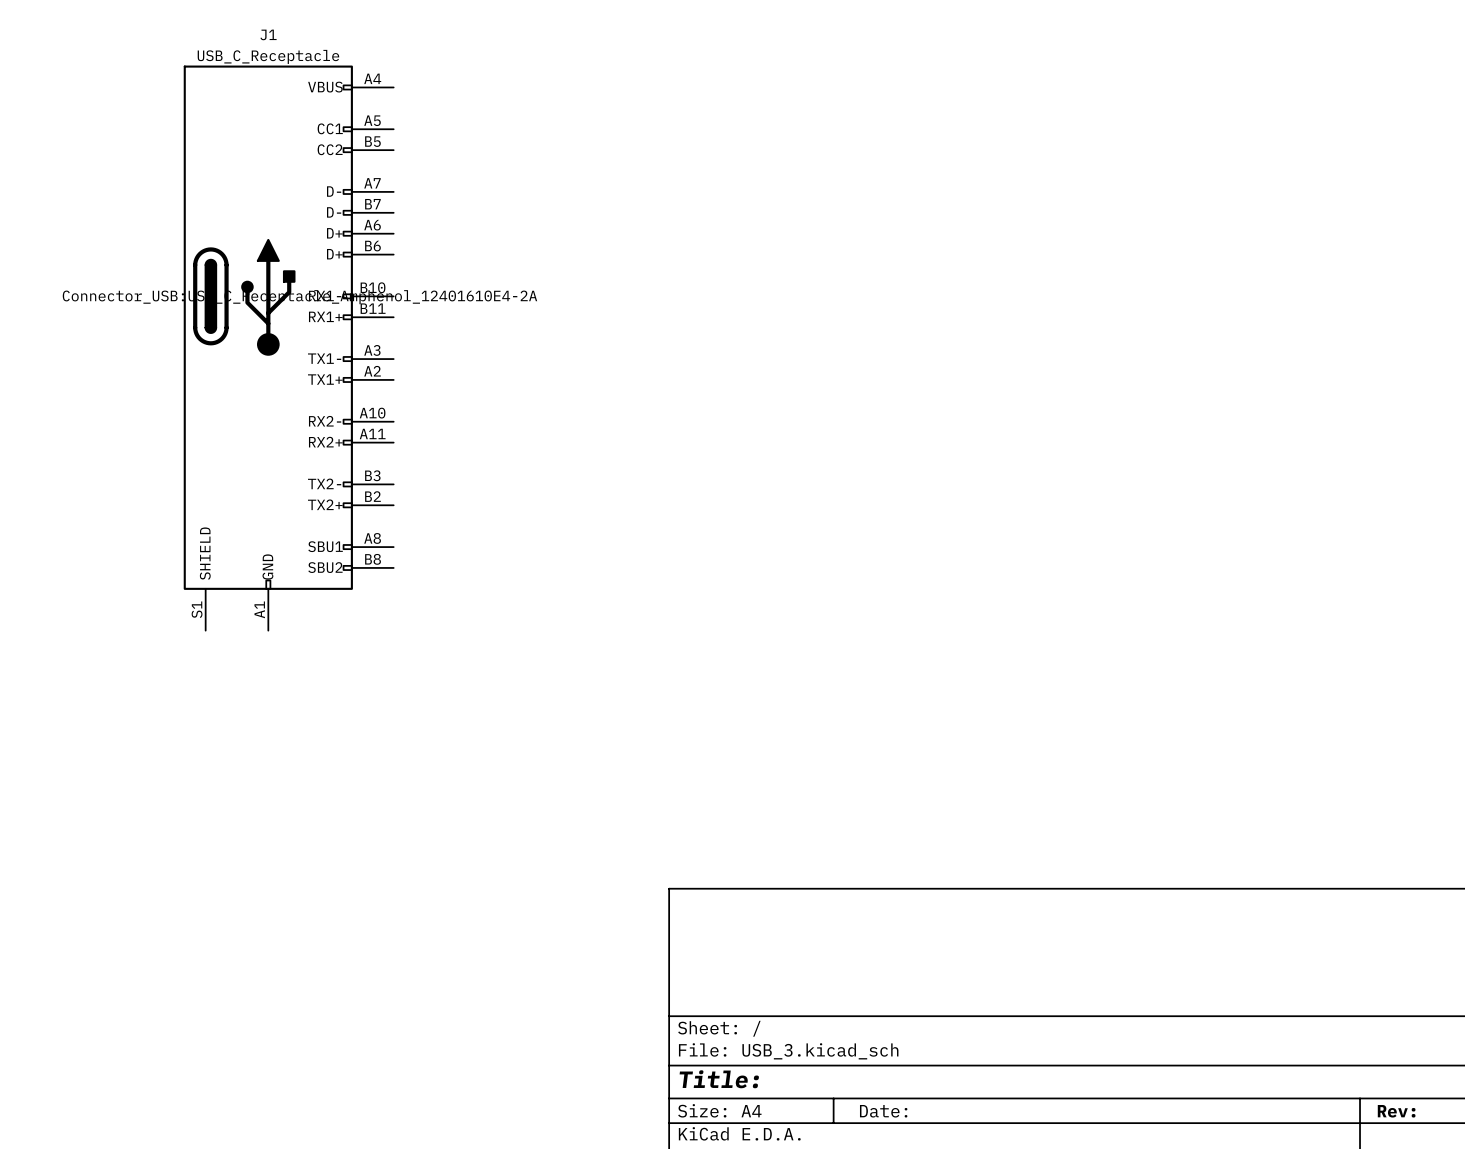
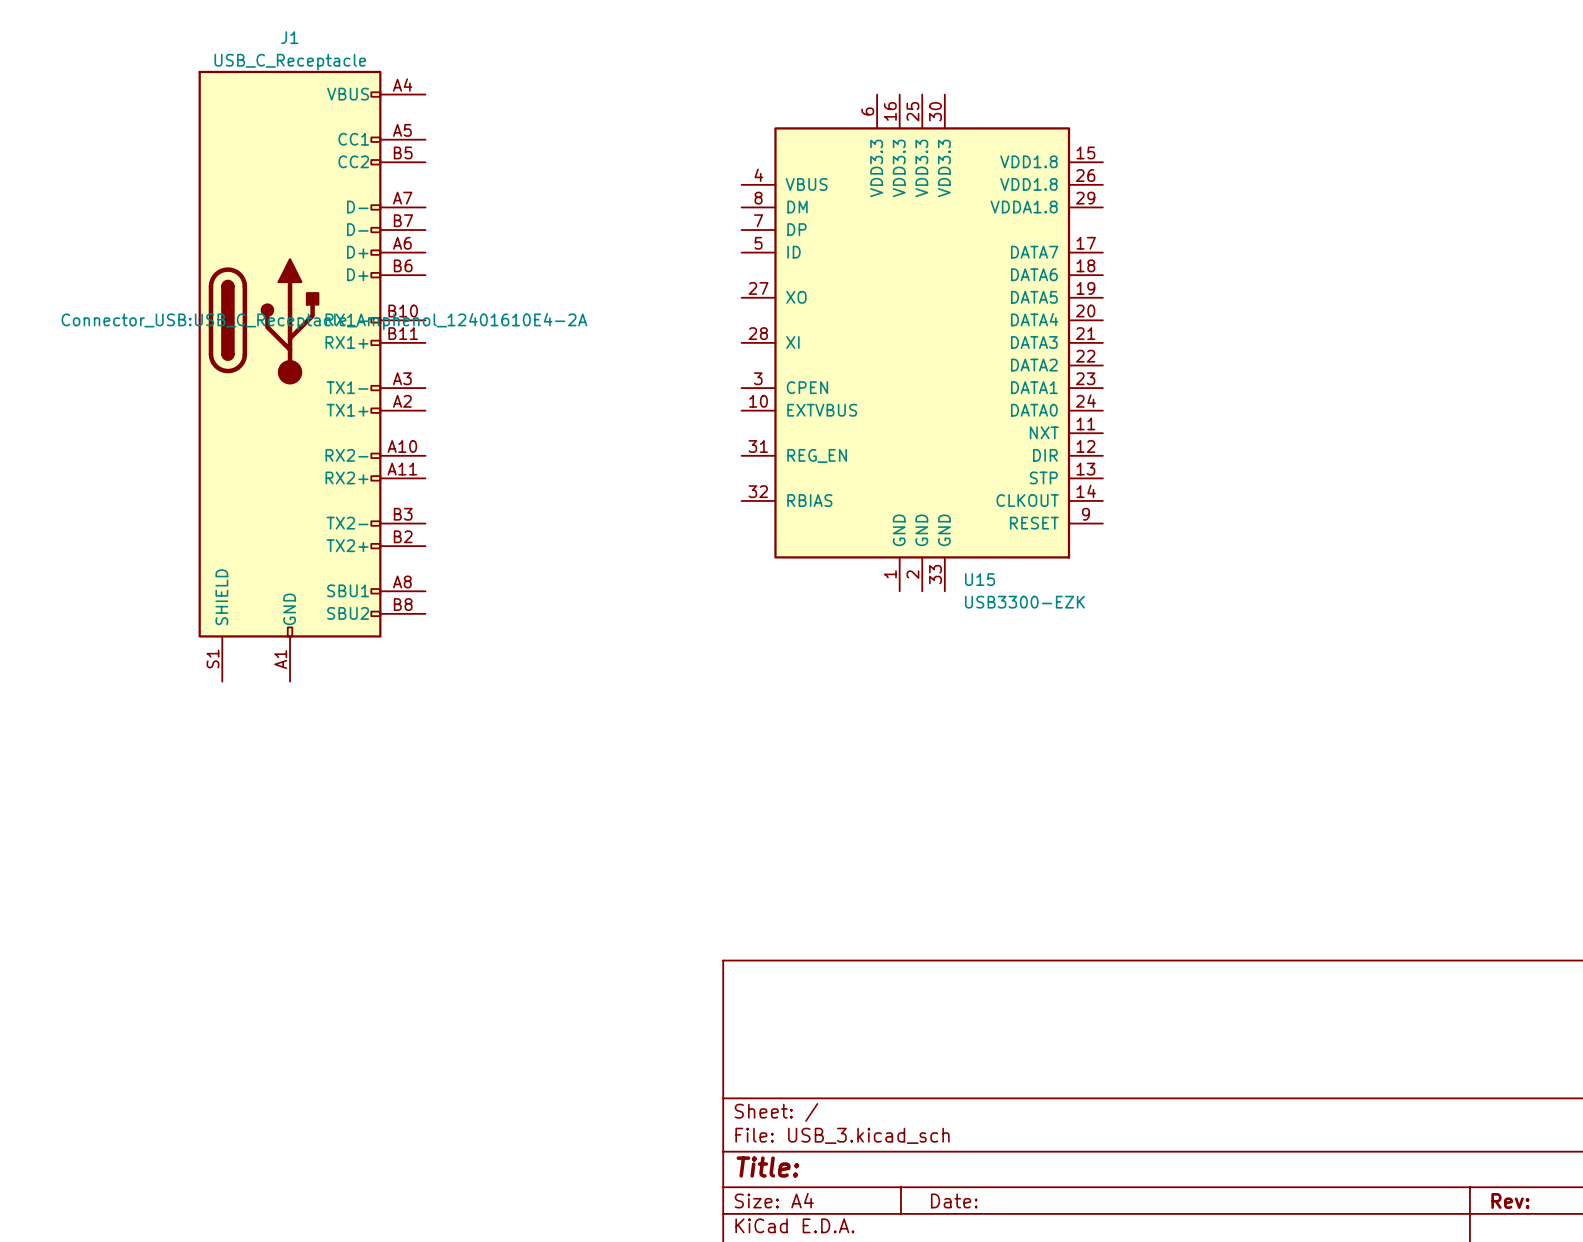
U15: none -> USB3300-EZK (922, 342)

